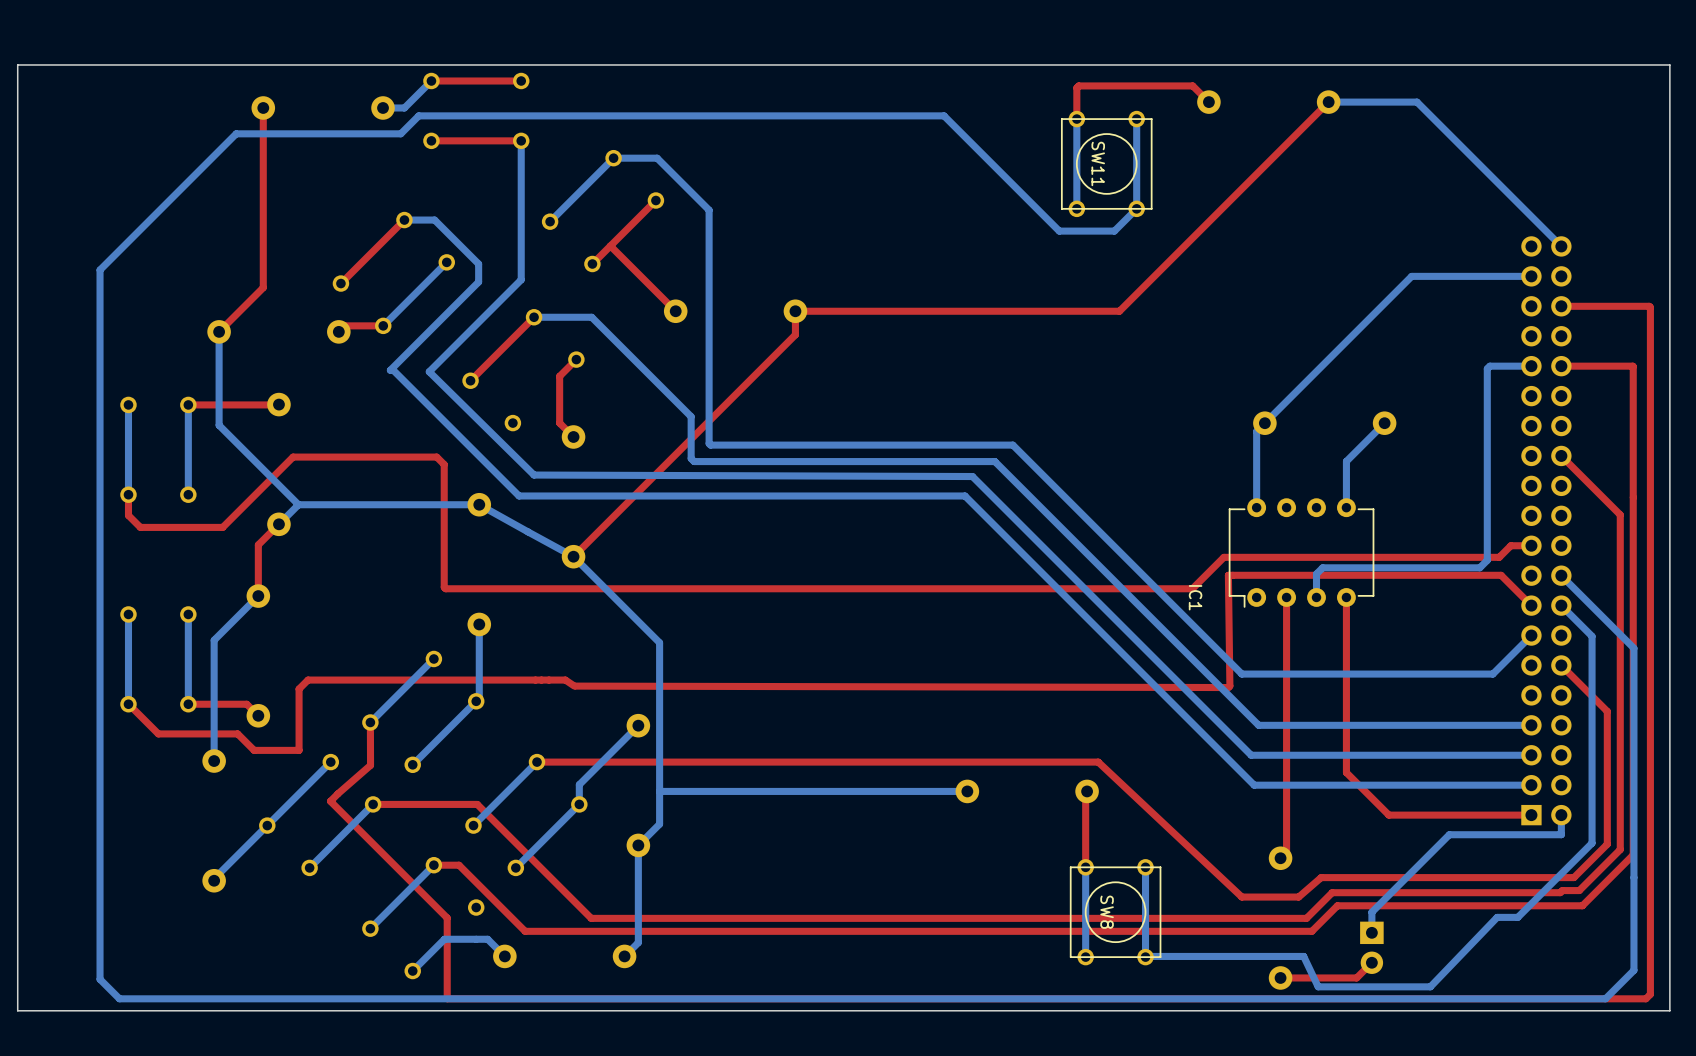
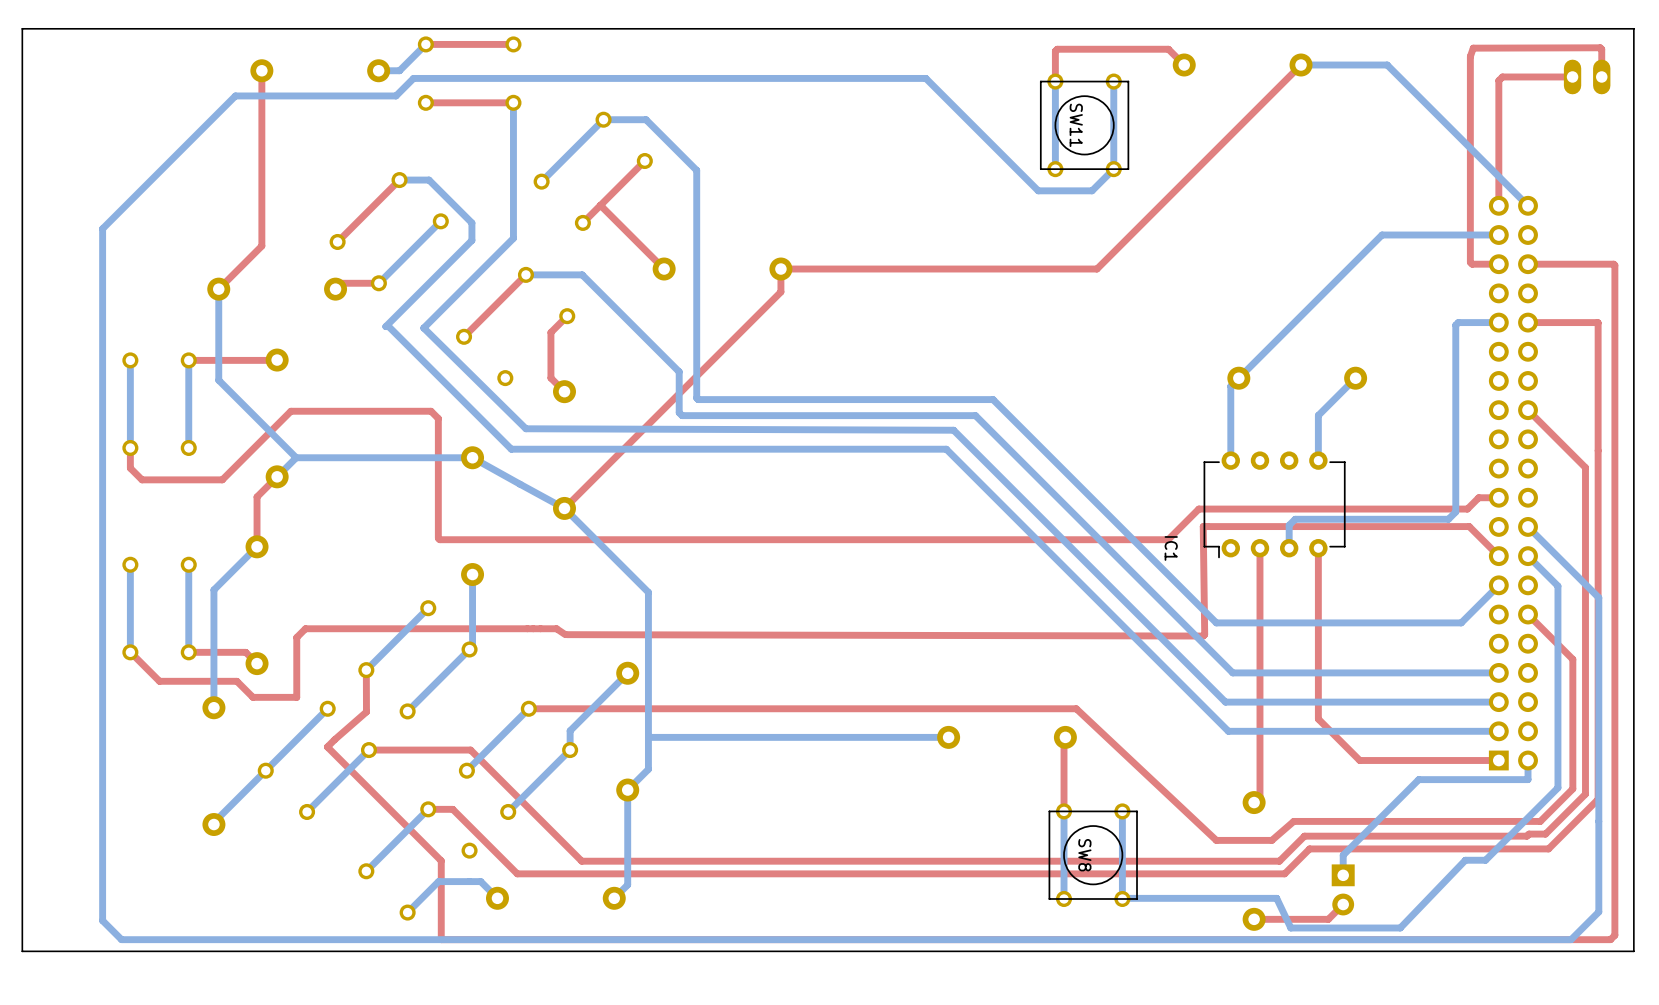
top track: none -> (1572, 76) (1502, 76) (1498, 80) (1498, 205)
part: none -> (1587, 76)
top track: none -> (1601, 76) (1600, 47) (1473, 48) (1470, 56) (1470, 262) (1472, 264) (1498, 264)

